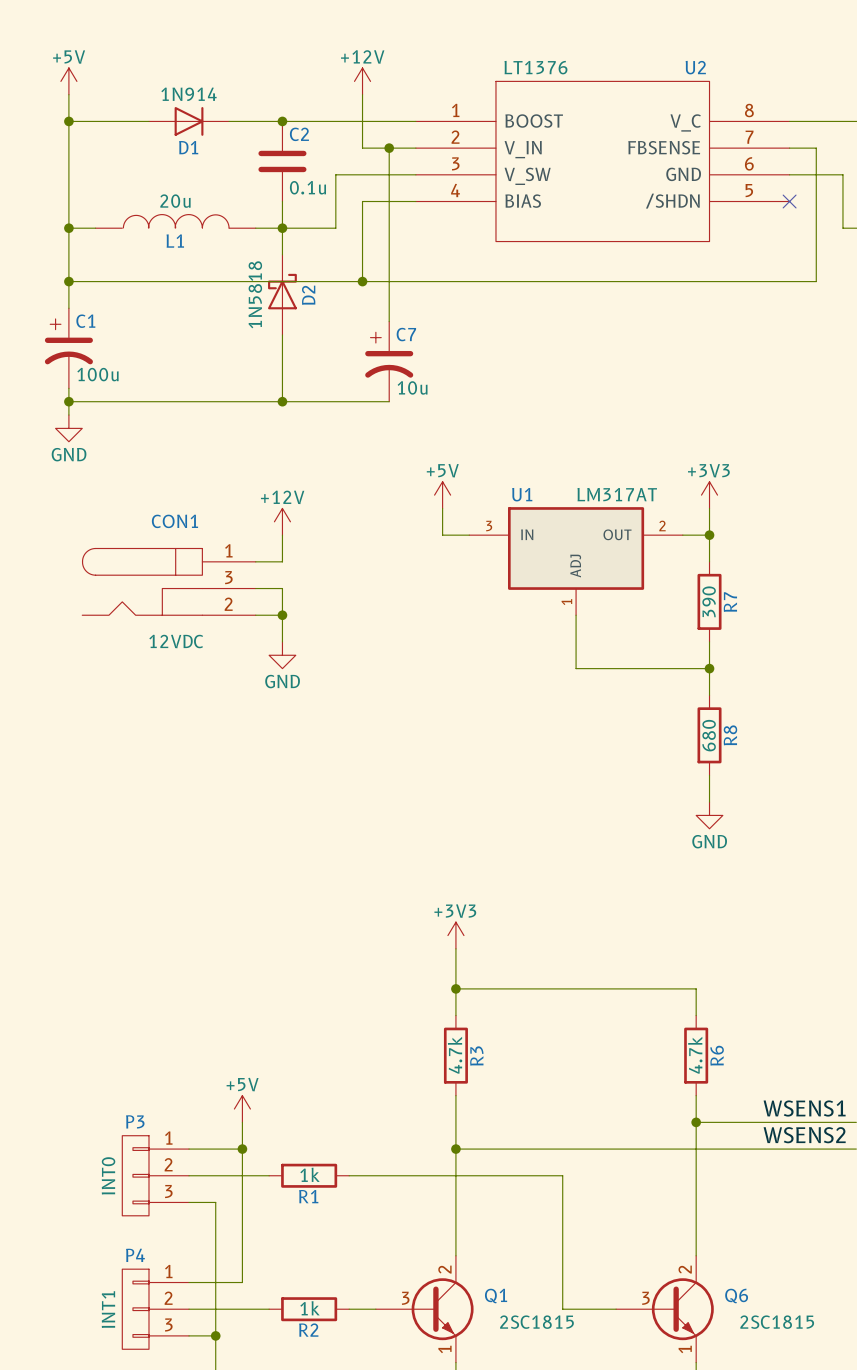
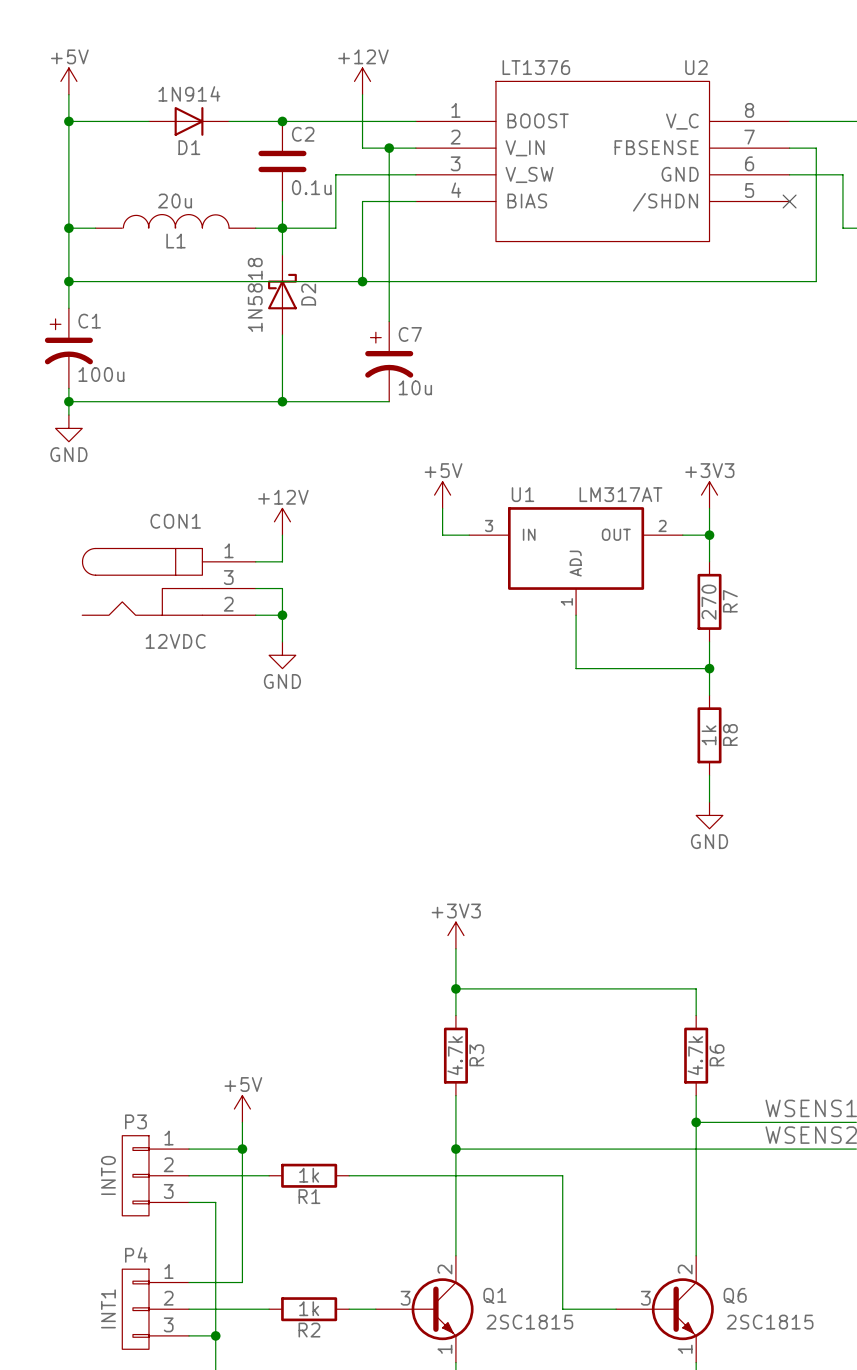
R7 value: 390 (709, 601) -> 270 (709, 602)
R8 value: 680 (709, 735) -> 1k (709, 735)

